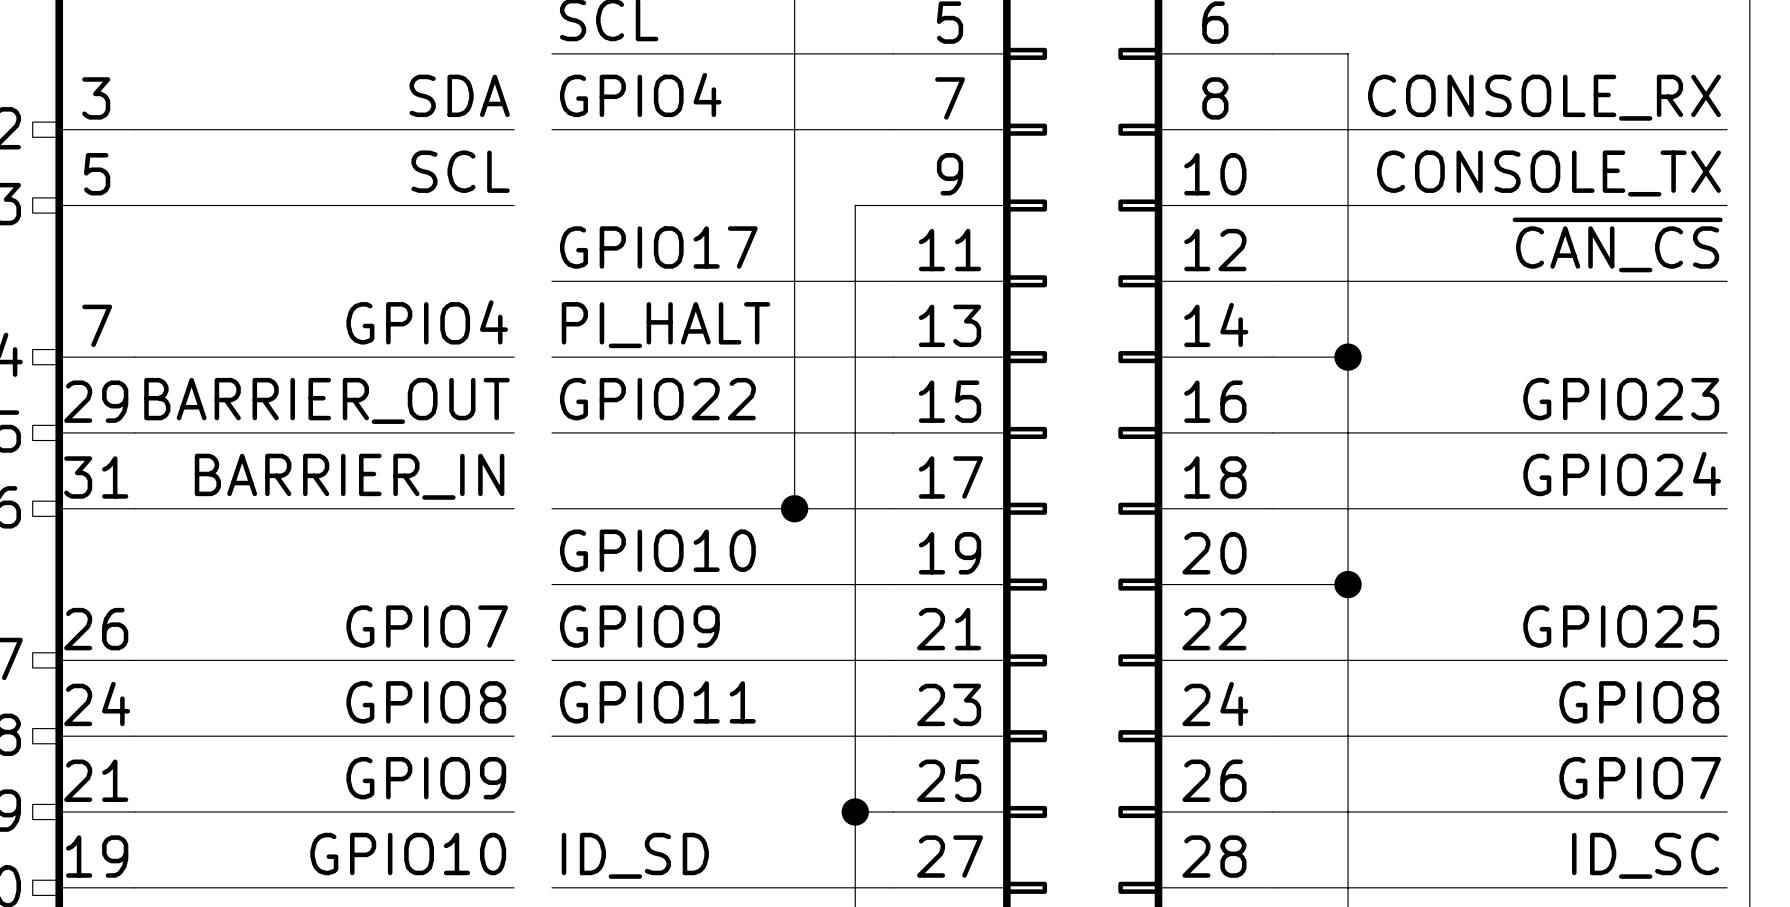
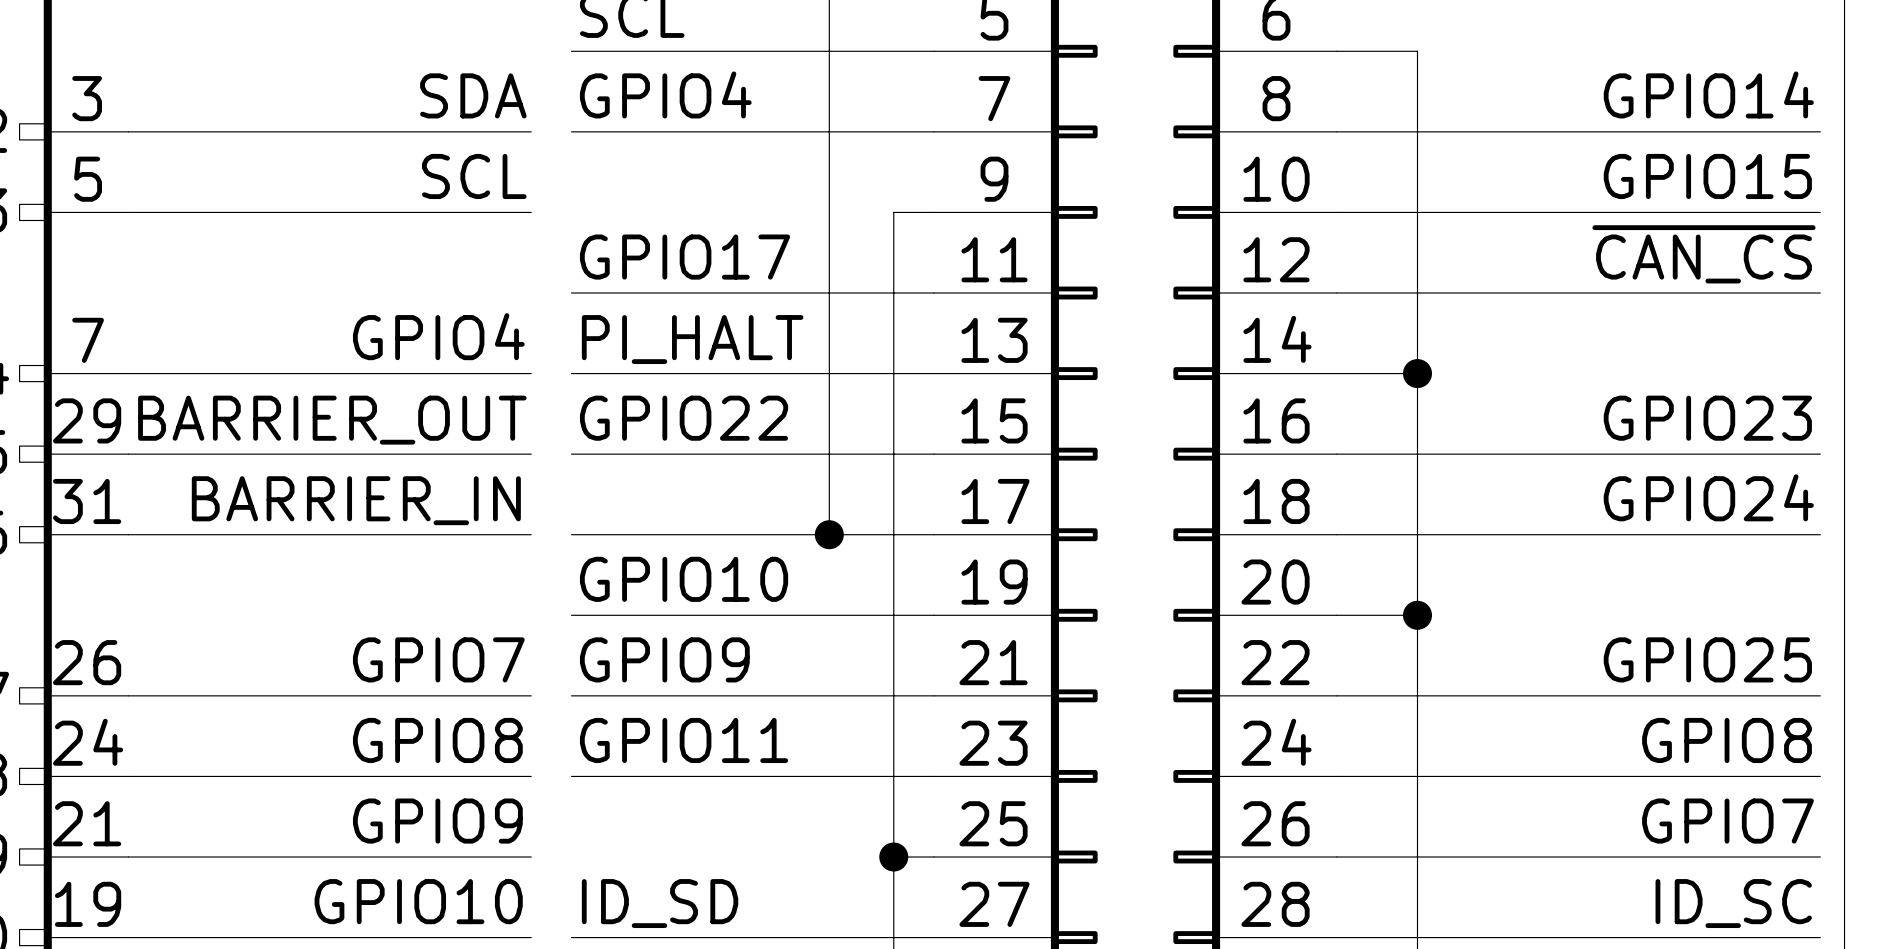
label: CONSOLE_RX (1544, 97) -> GPIO14 (1708, 94)
label: CONSOLE_TX (1549, 173) -> GPIO15 (1707, 176)

